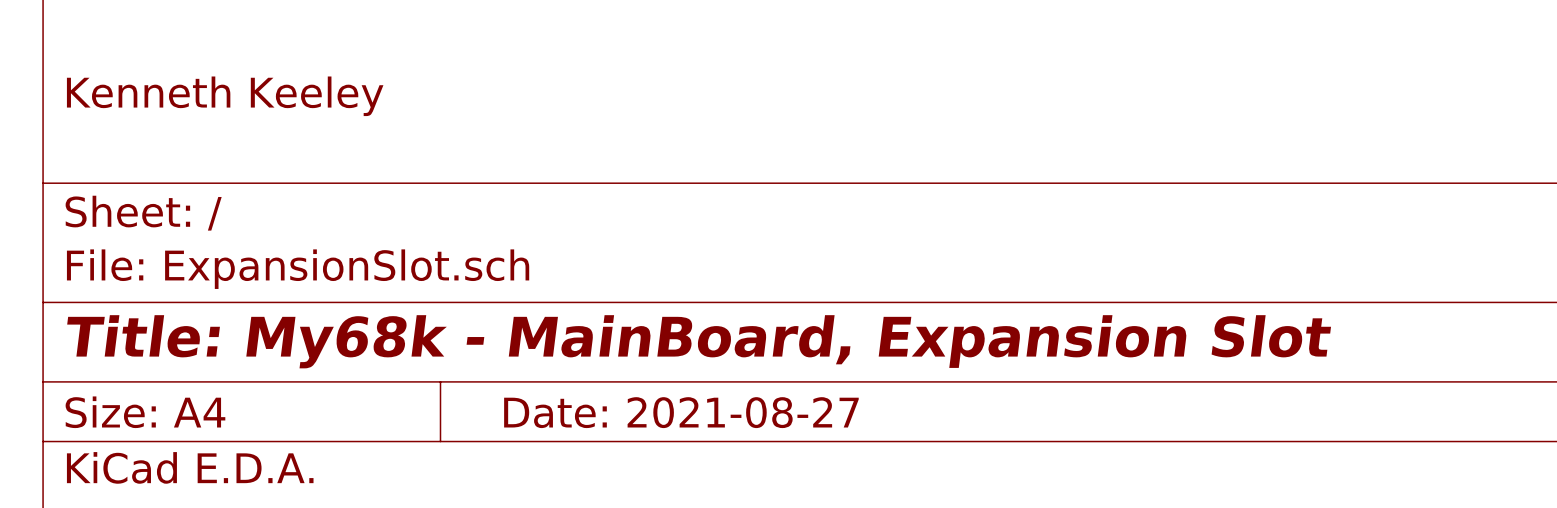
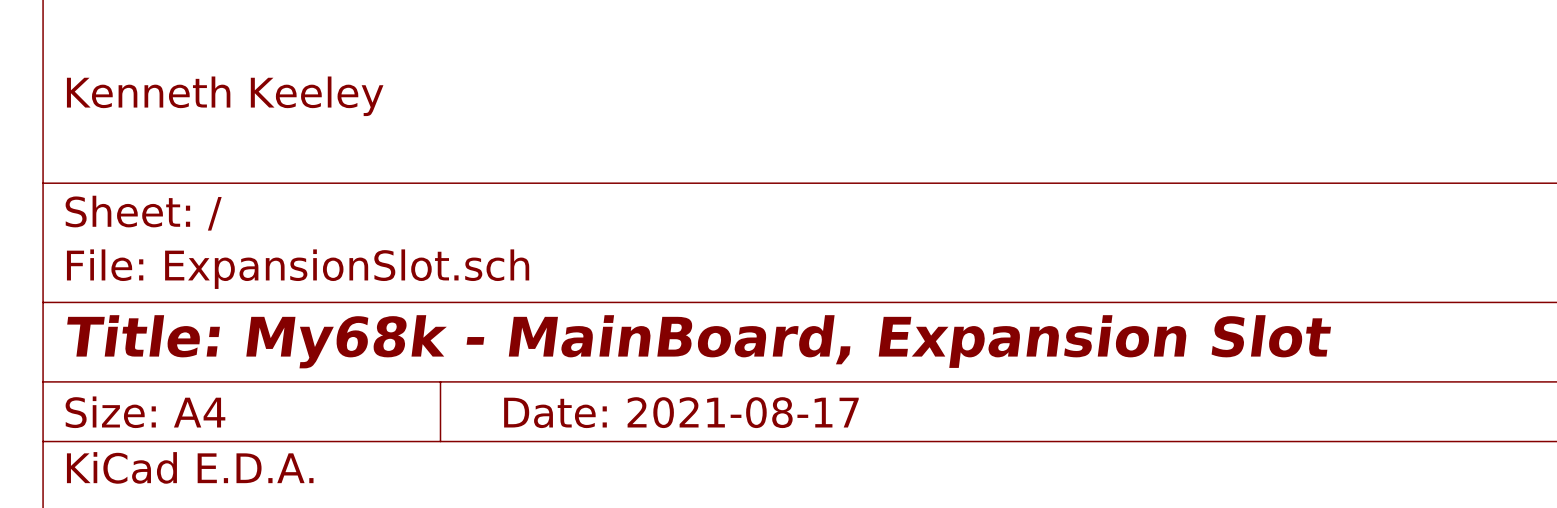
title block: Date: 2021-08-27 (681, 412) -> Date: 2021-08-17 (681, 412)

